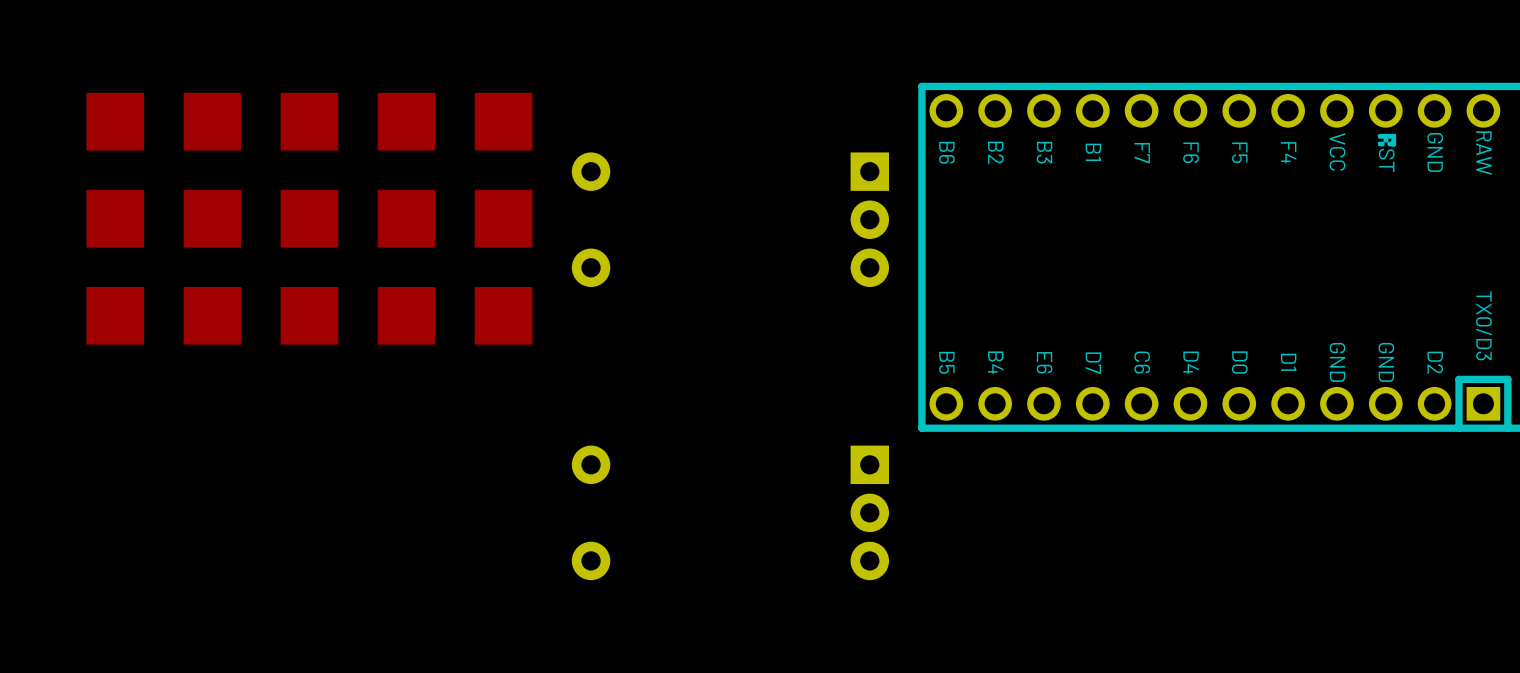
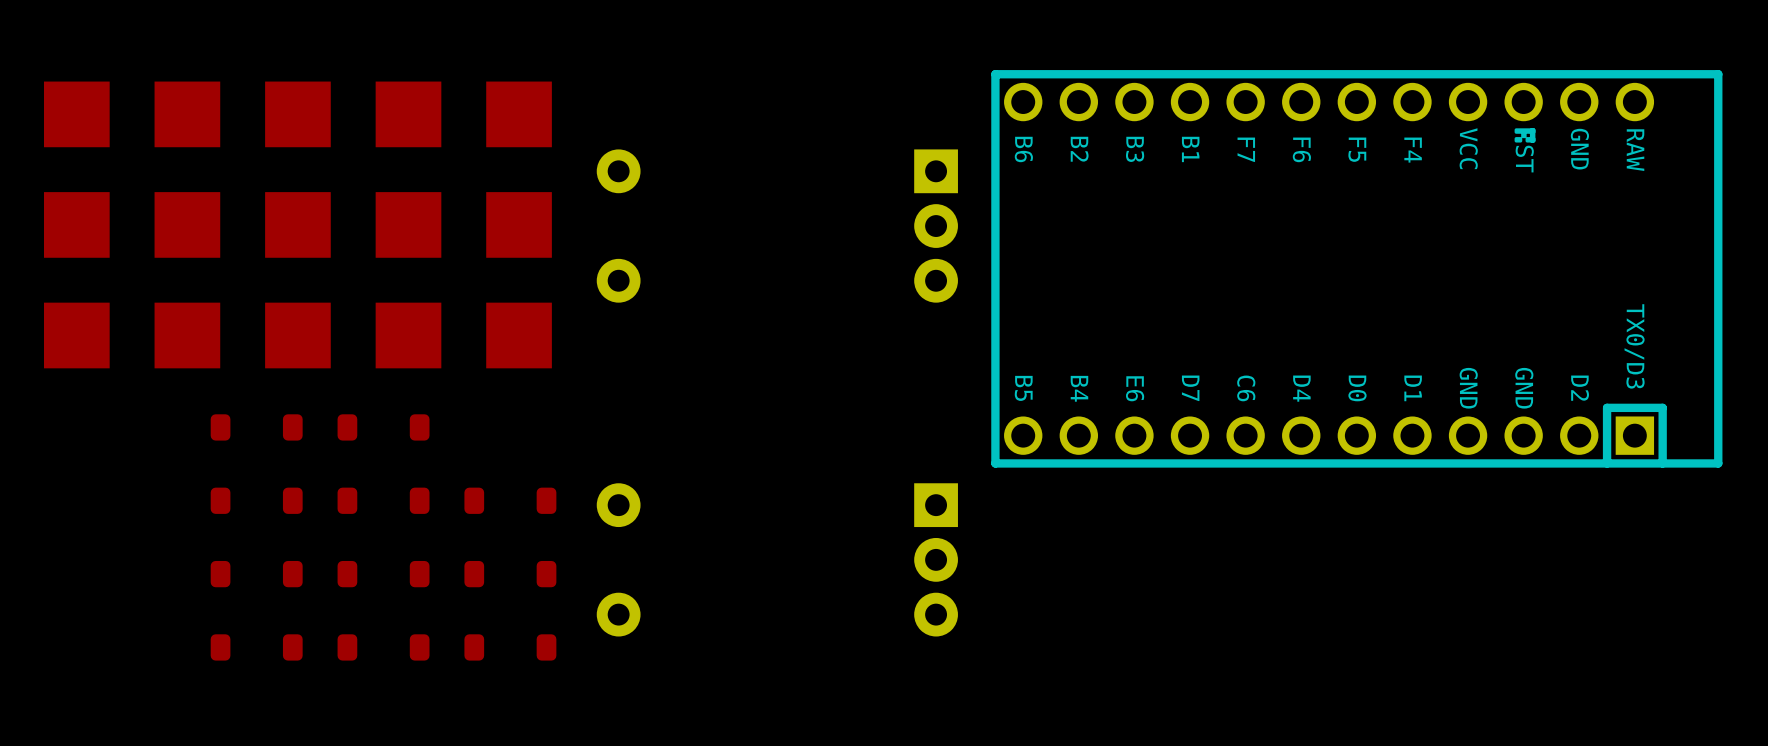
part: none -> (256, 427)
part: none -> (383, 427)
part: none -> (256, 500)
part: none -> (383, 500)
part: none -> (510, 500)
part: none -> (256, 574)
part: none -> (383, 574)
part: none -> (510, 574)
part: none -> (256, 647)
part: none -> (383, 647)
part: none -> (510, 647)

